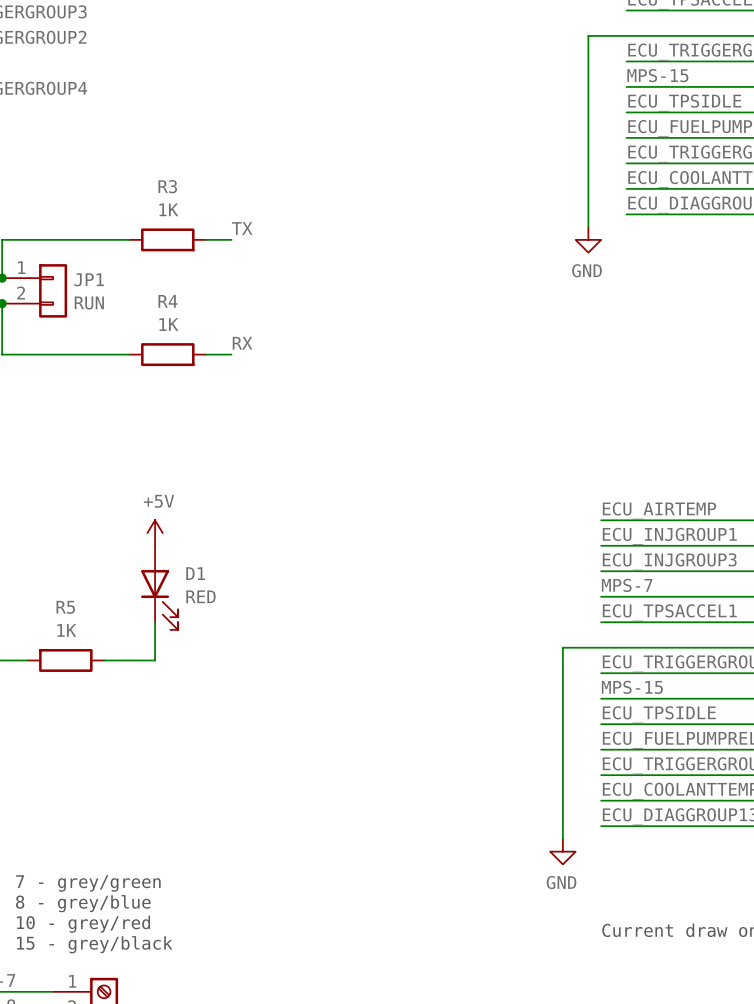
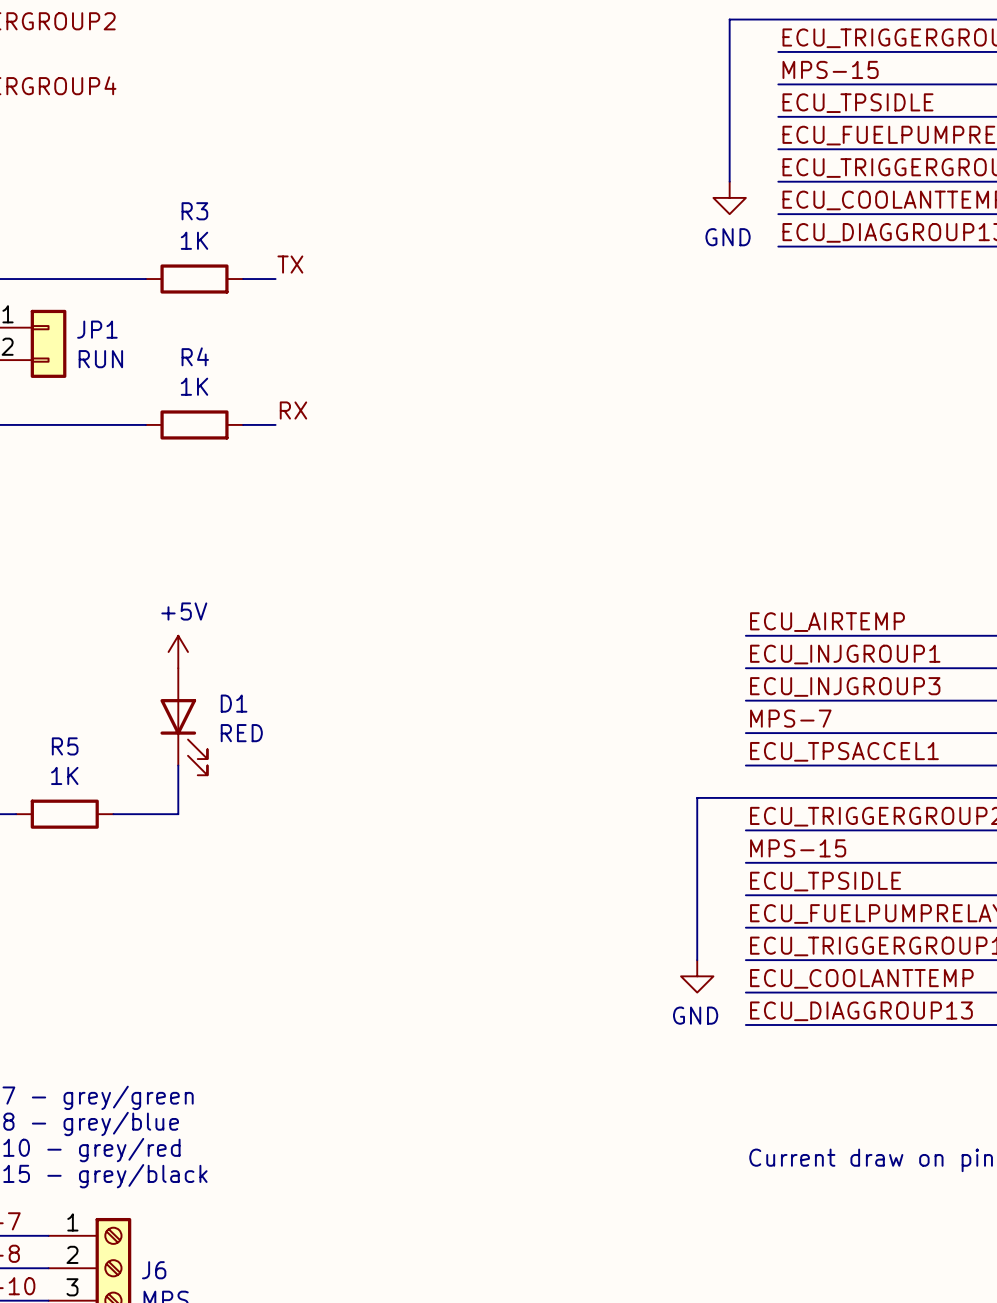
wire: (588, 163) (588, 227) -> none
power symbol position: GND (588, 239) -> GND (729, 197)
wire: (562, 775) (562, 838) -> none
power symbol position: GND (562, 851) -> GND (697, 976)

